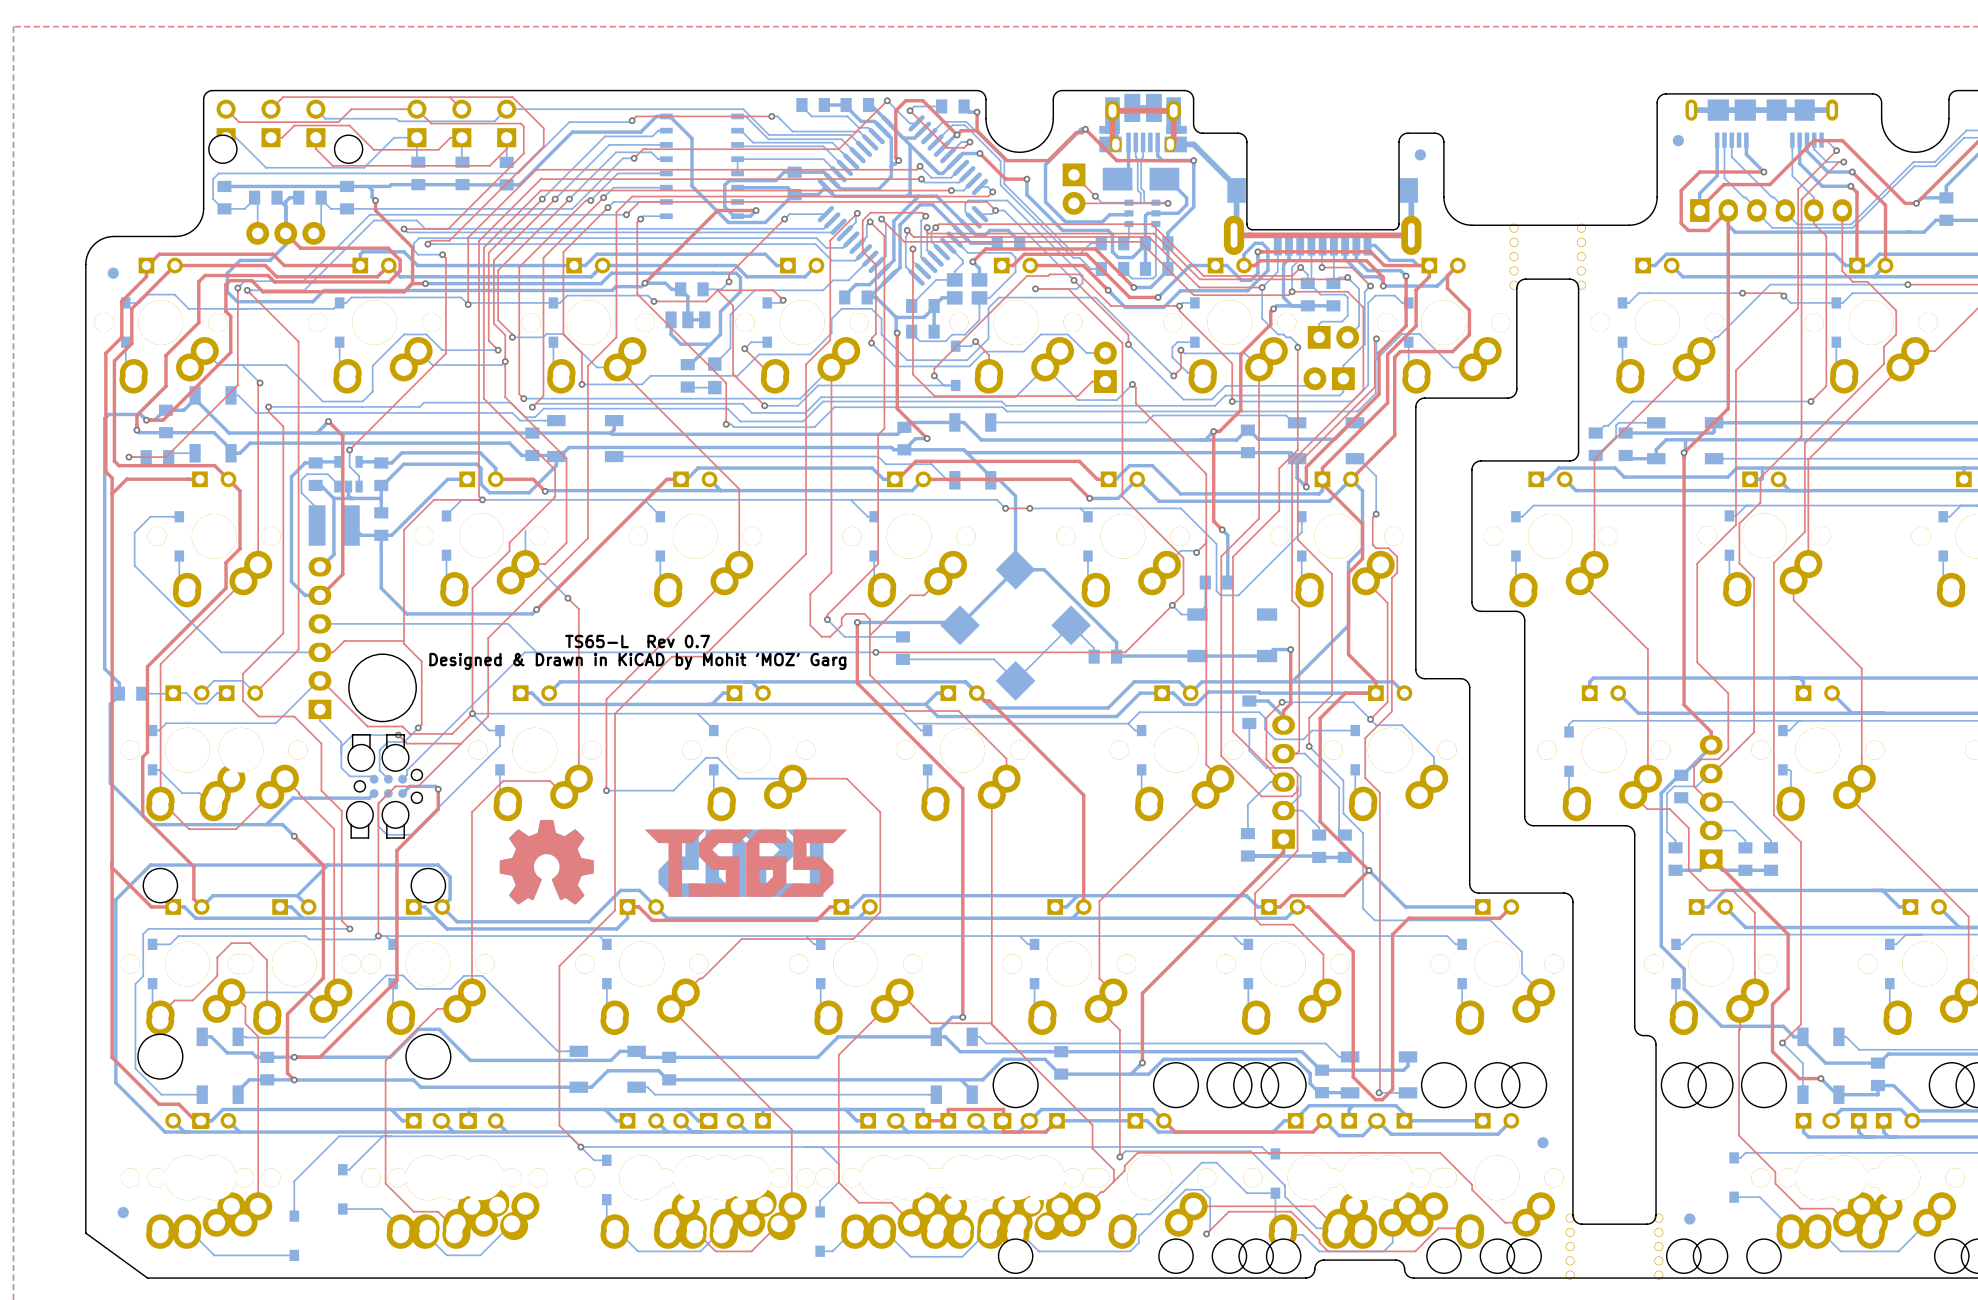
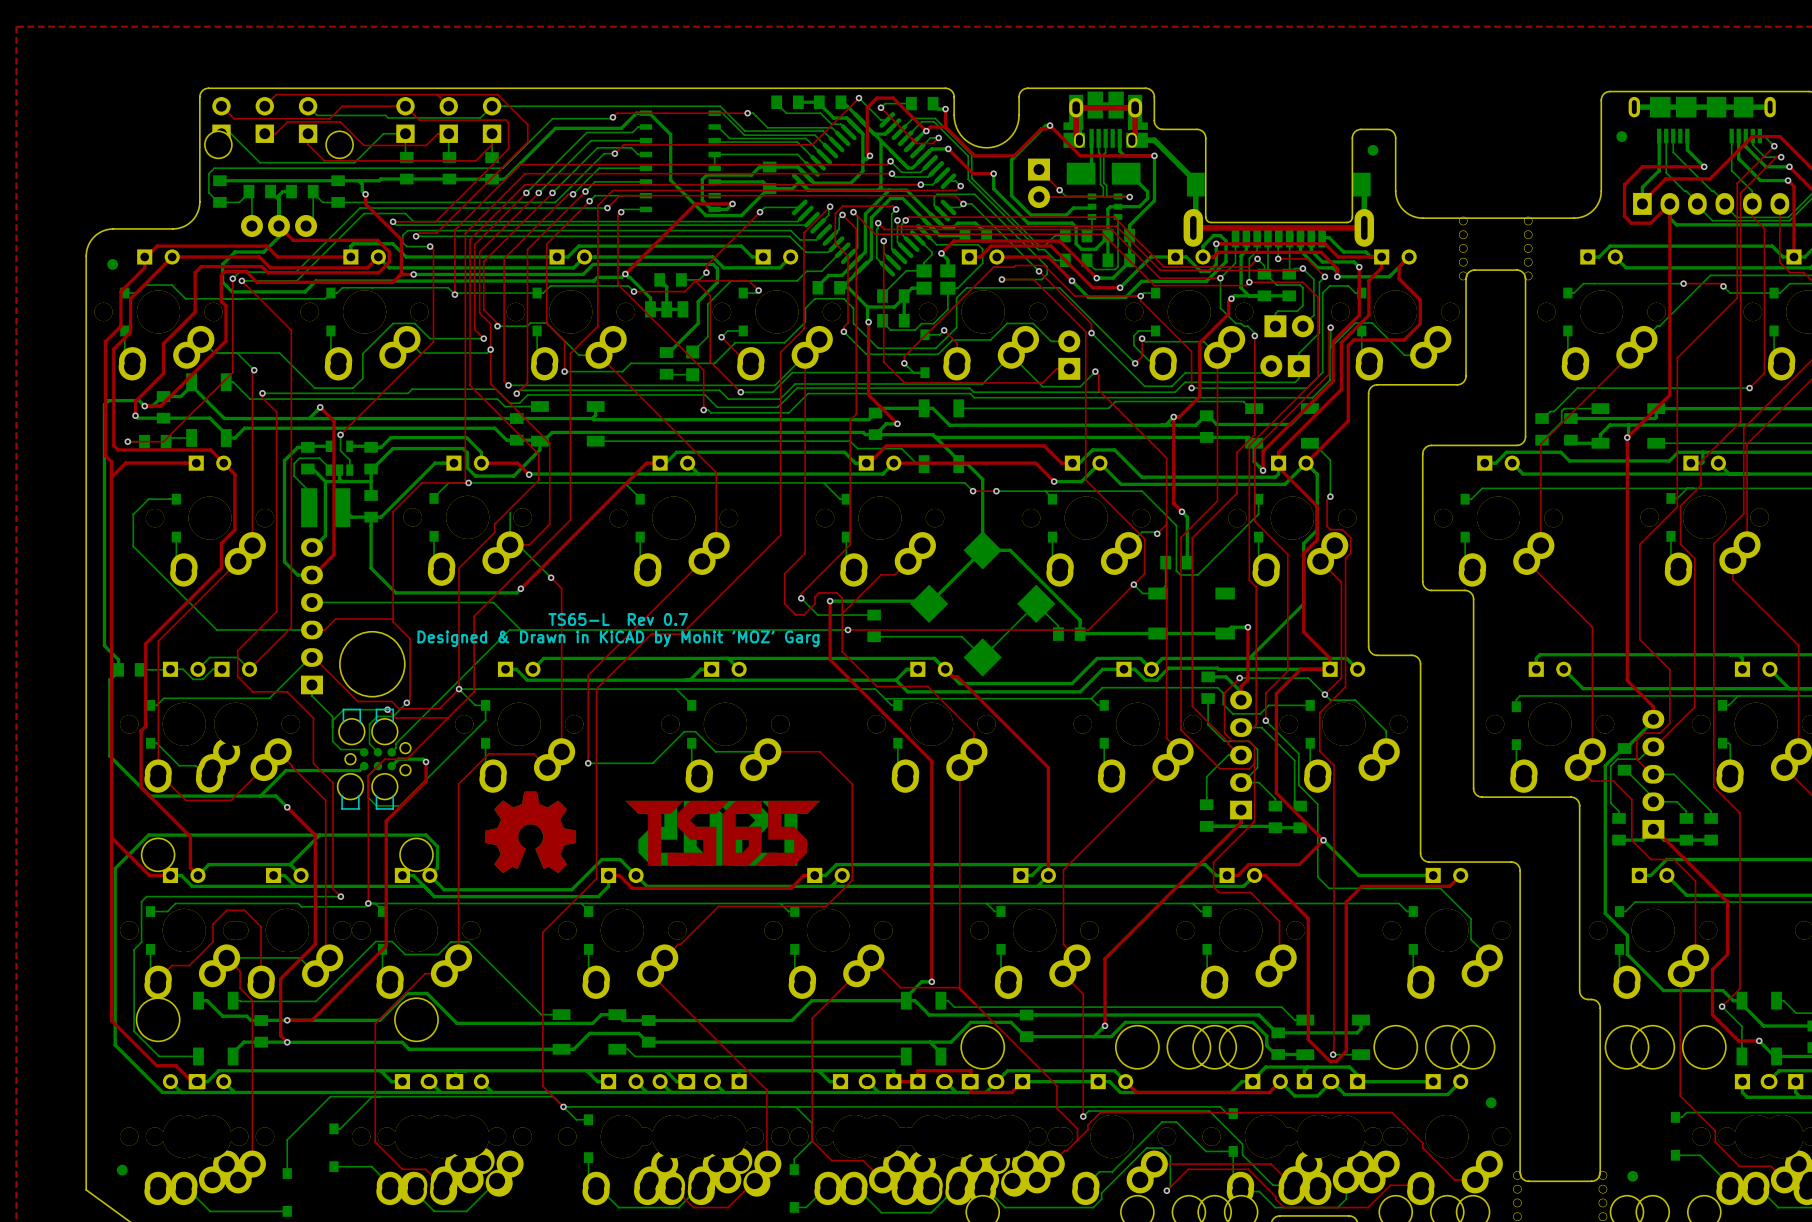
bottom track: (644, 283) (665, 283) (671, 289) (680, 289) -> (625, 274) (650, 297) (650, 309) (666, 309)
bottom track: (671, 319) (671, 334) (680, 344) (710, 344) -> none

